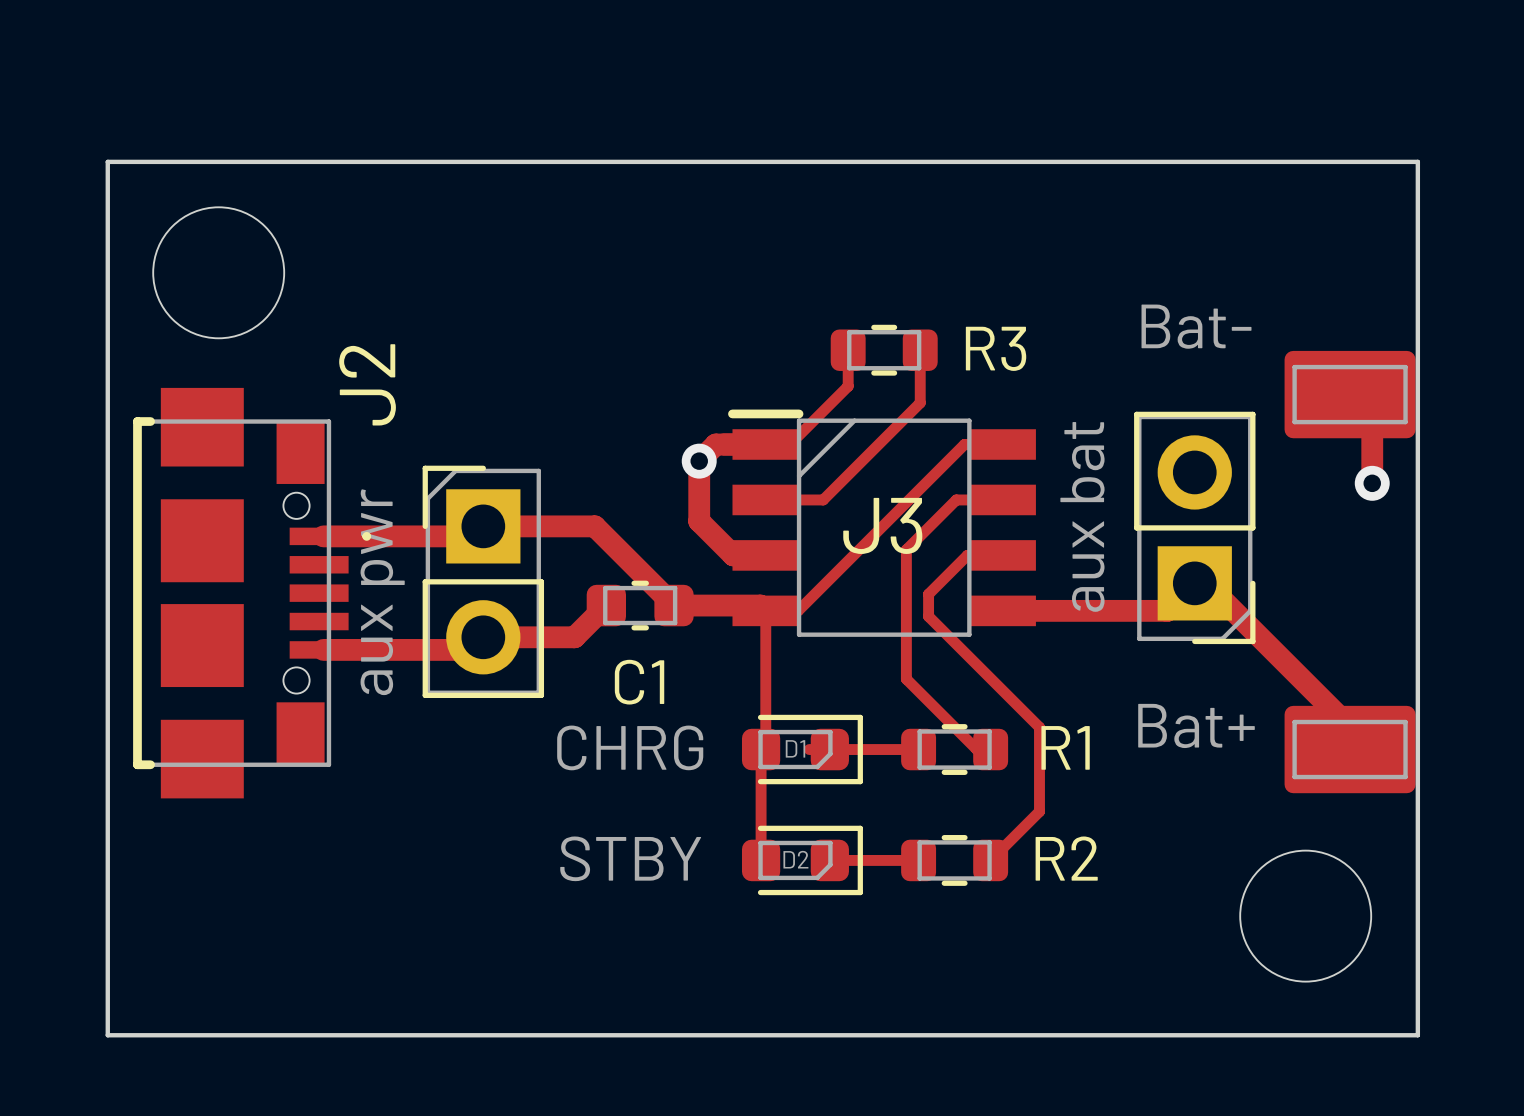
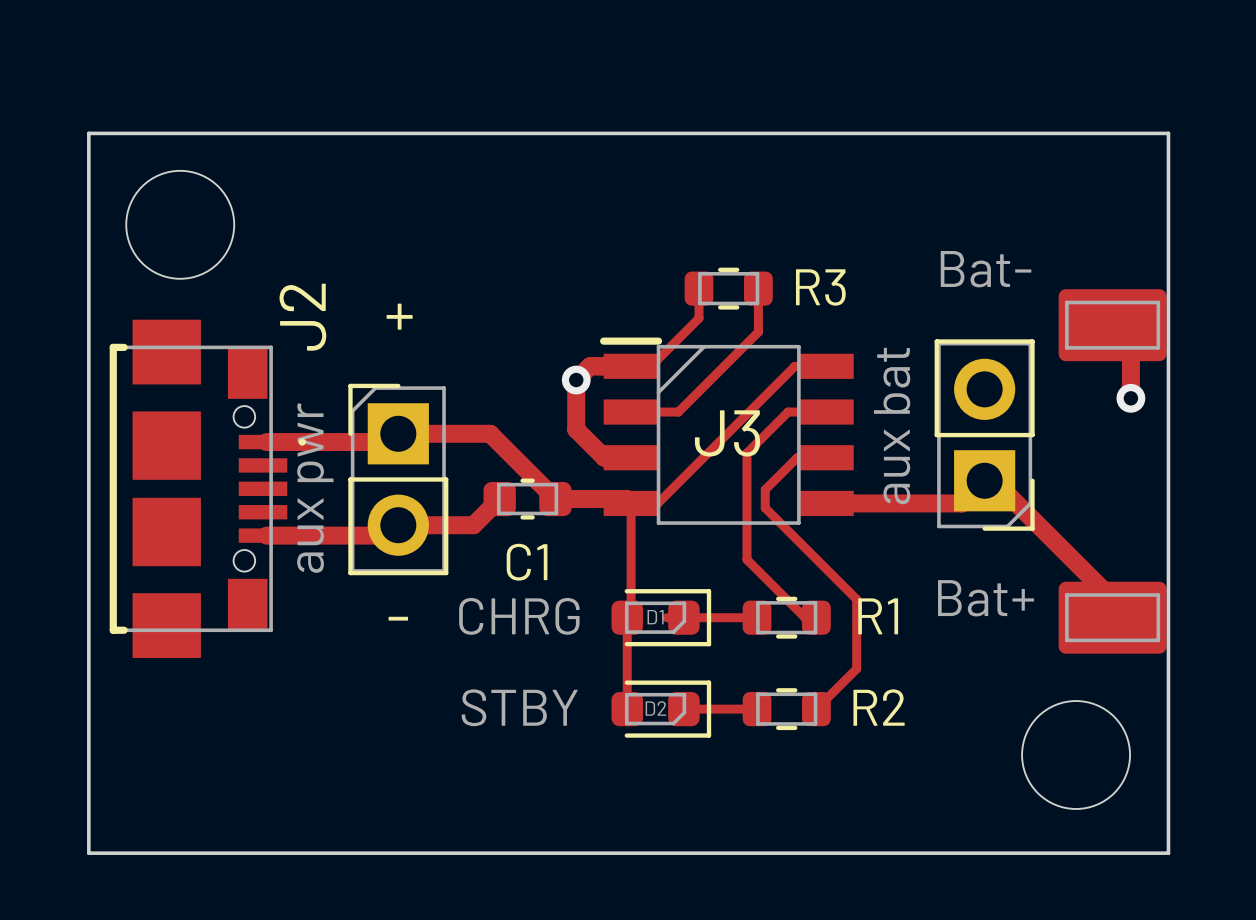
text: none -> + (399, 316)
text: none -> - (398, 618)

